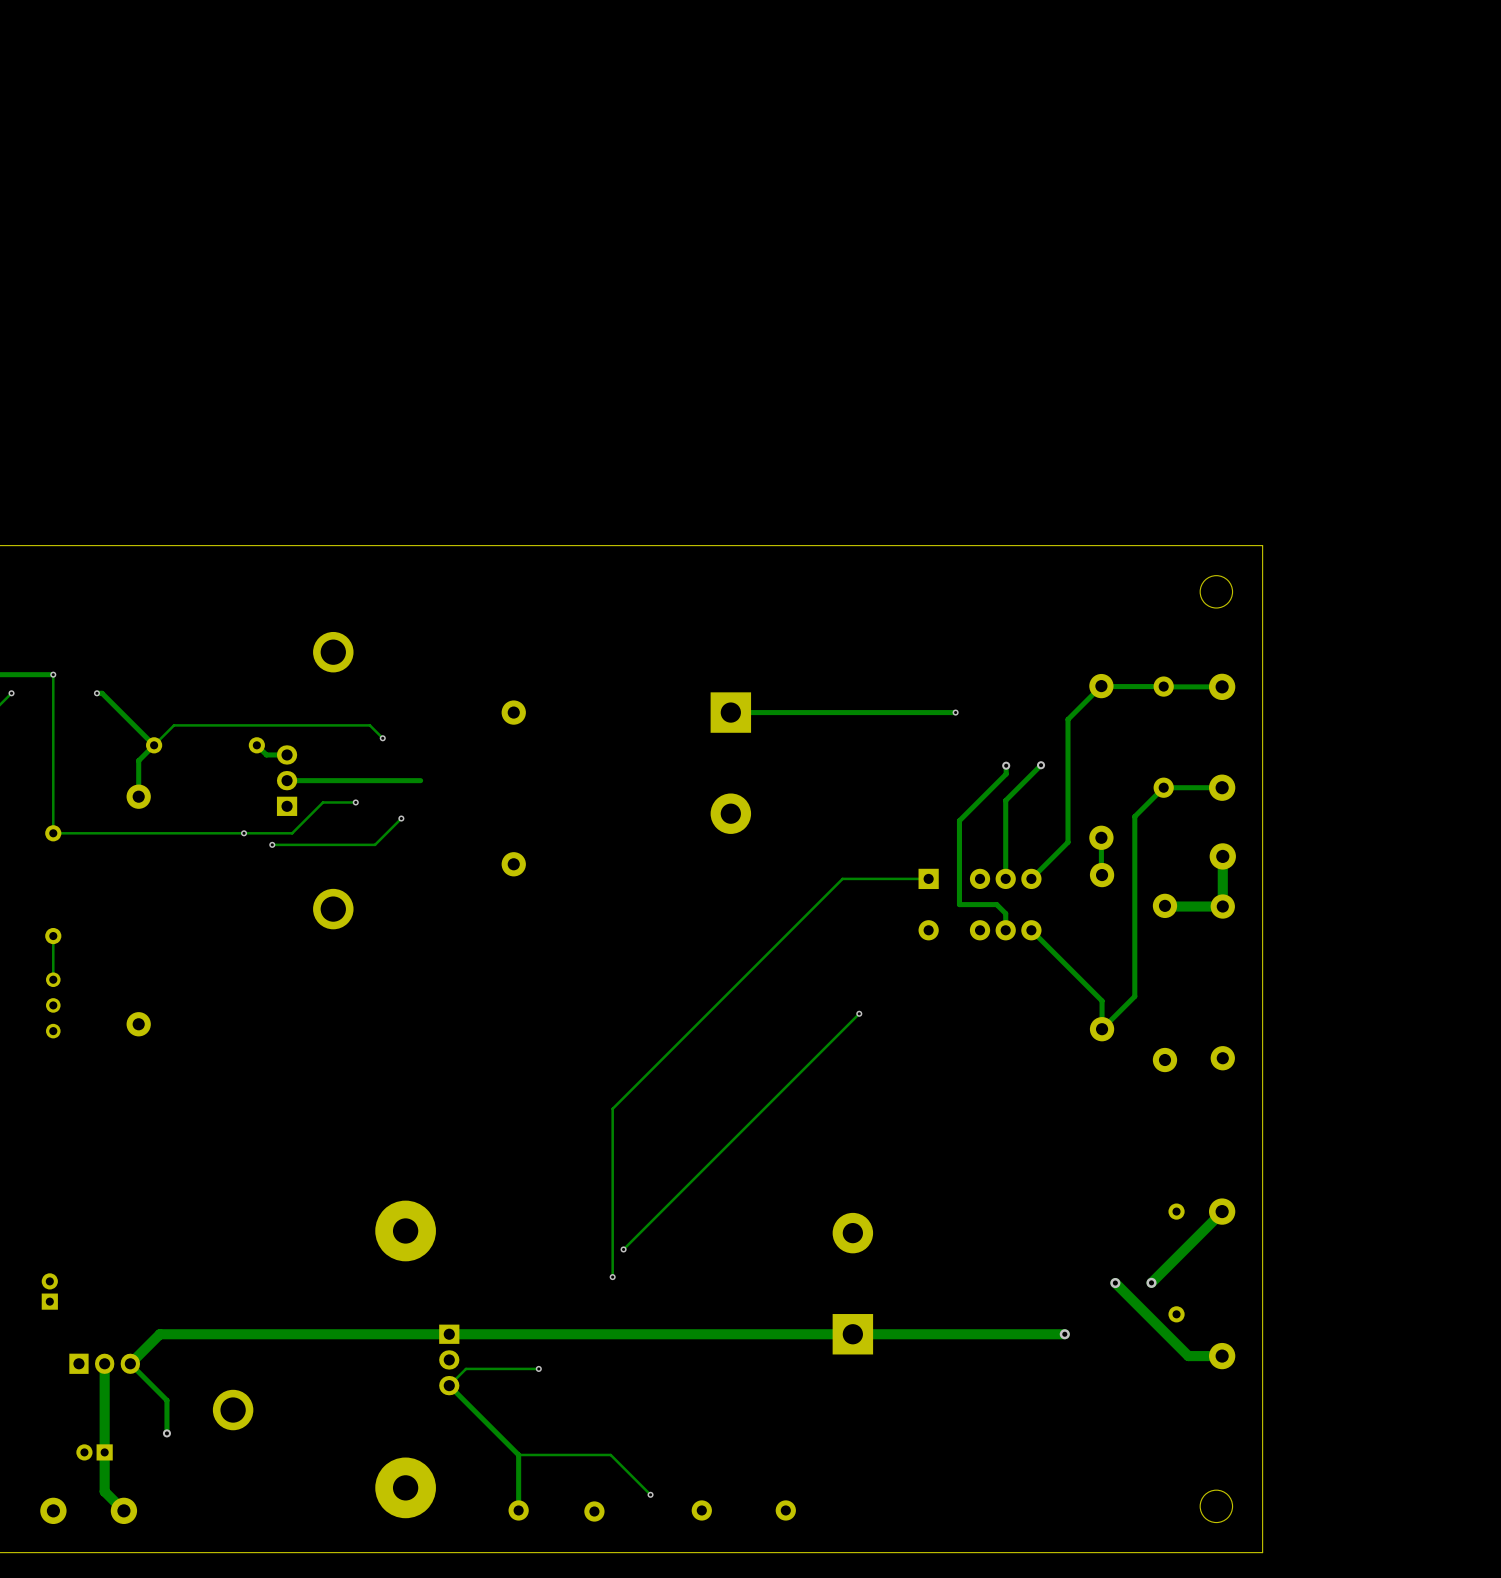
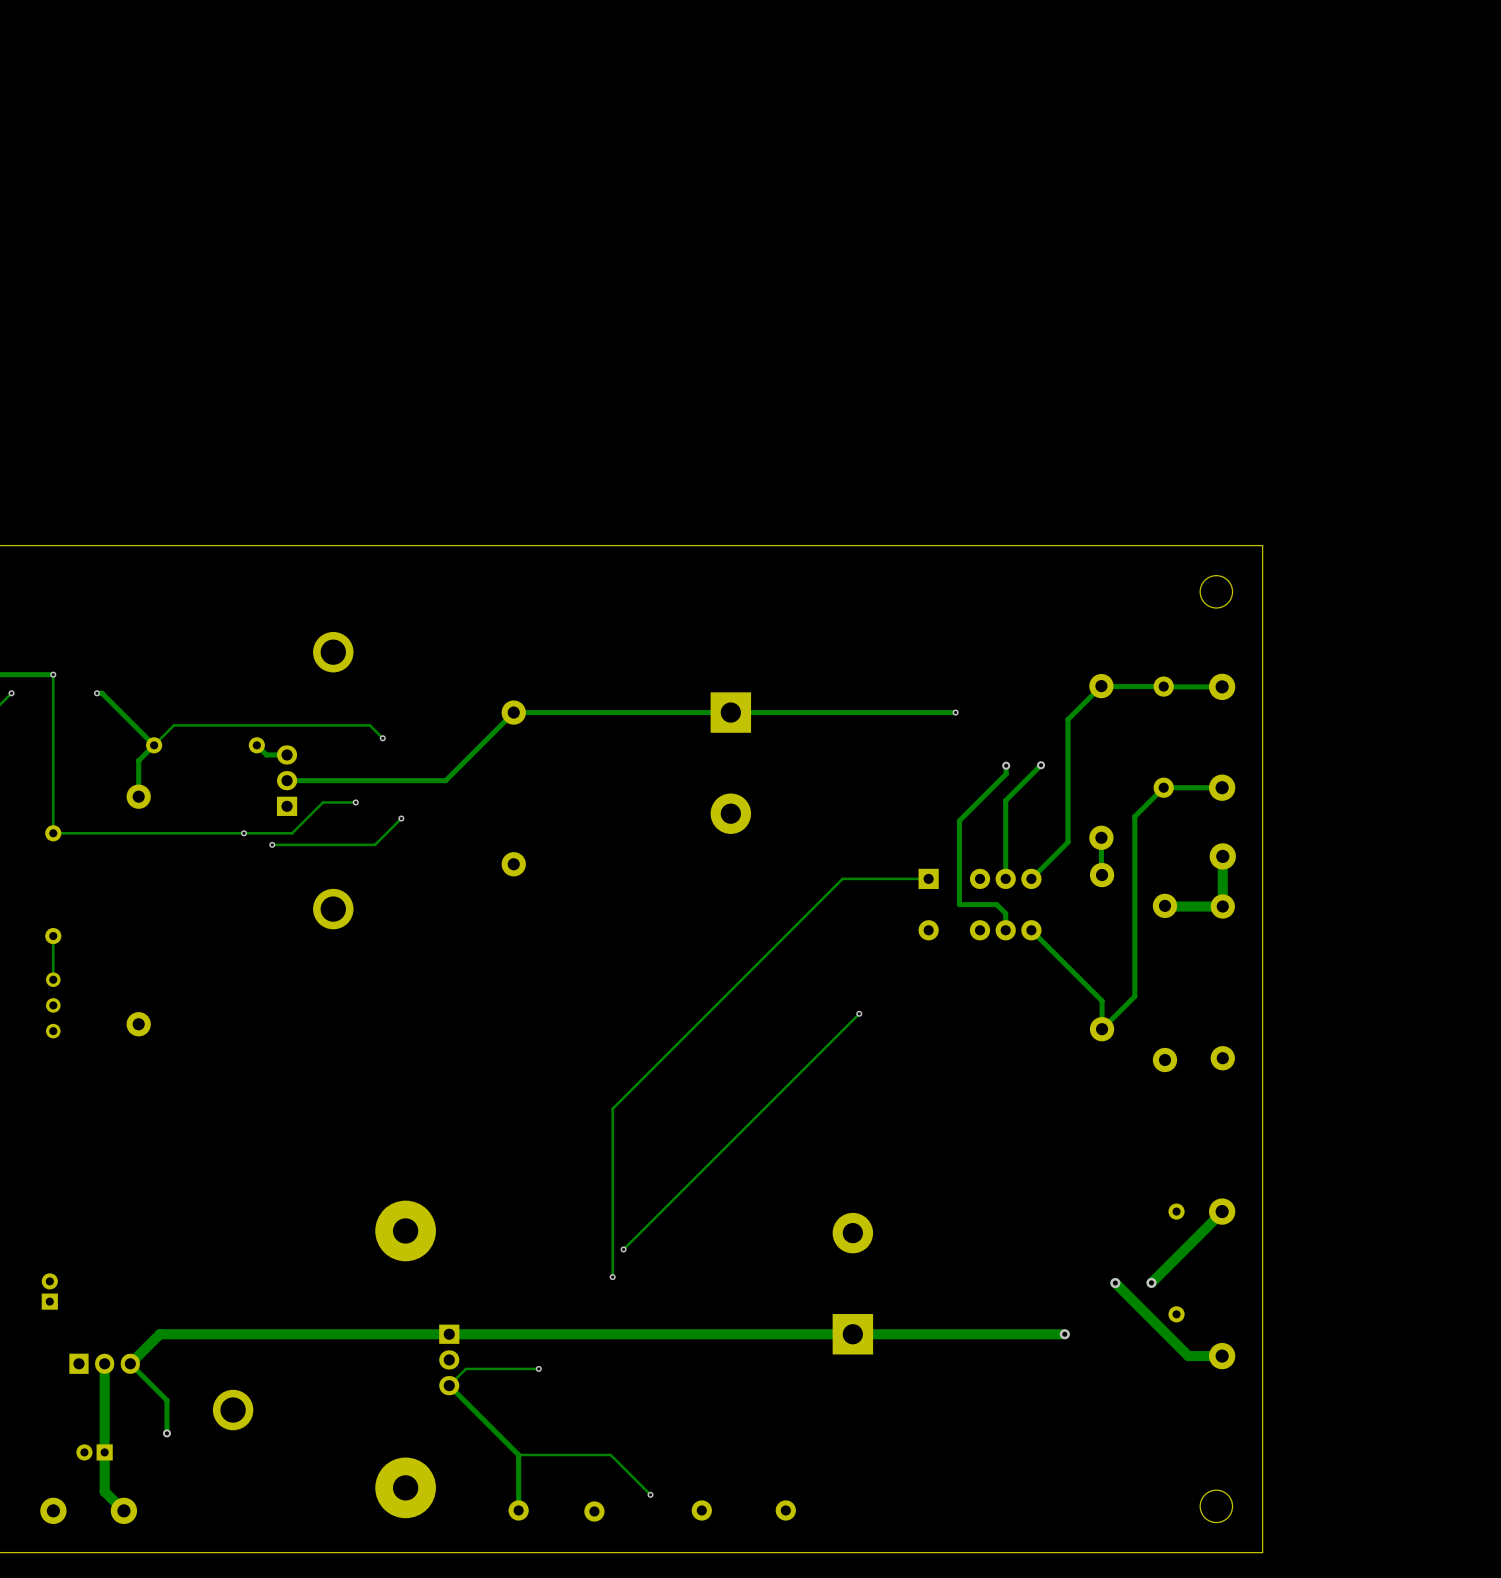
track: none -> (730, 712) (513, 712) (445, 780) (420, 780)

